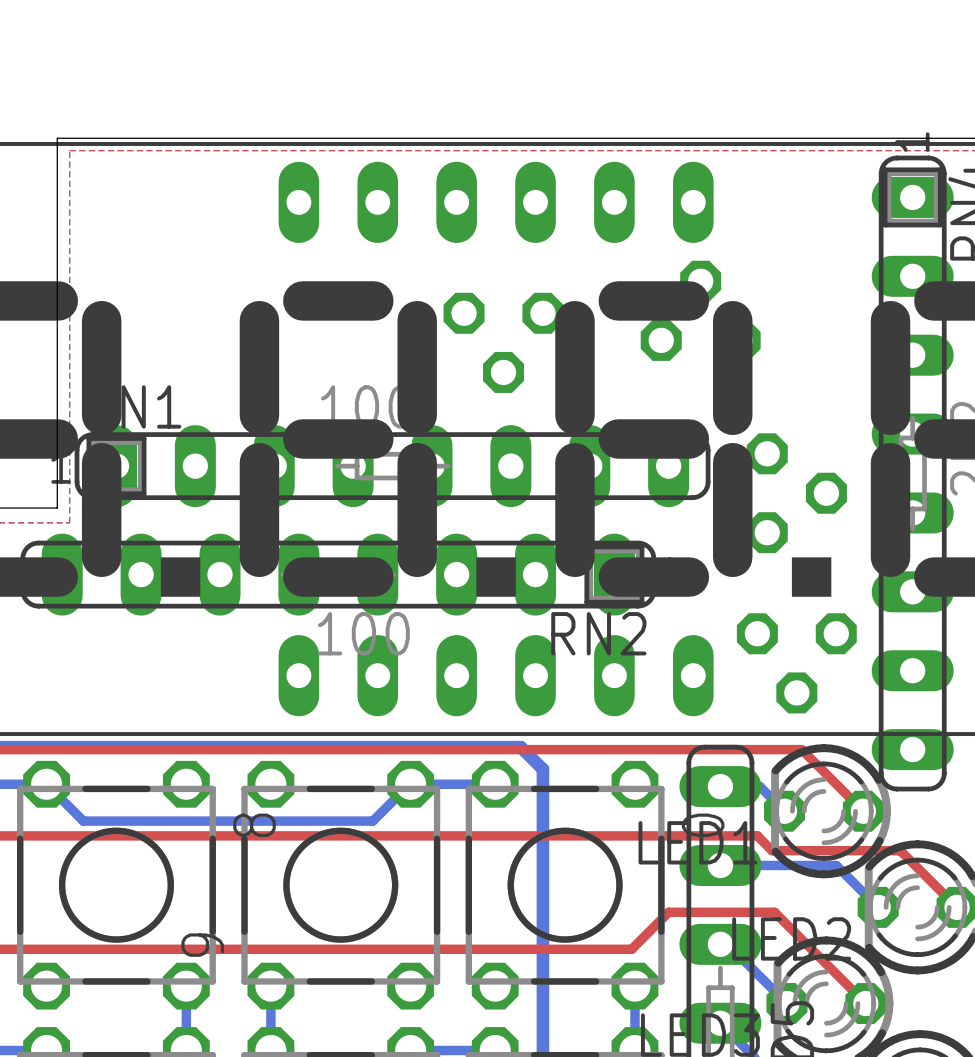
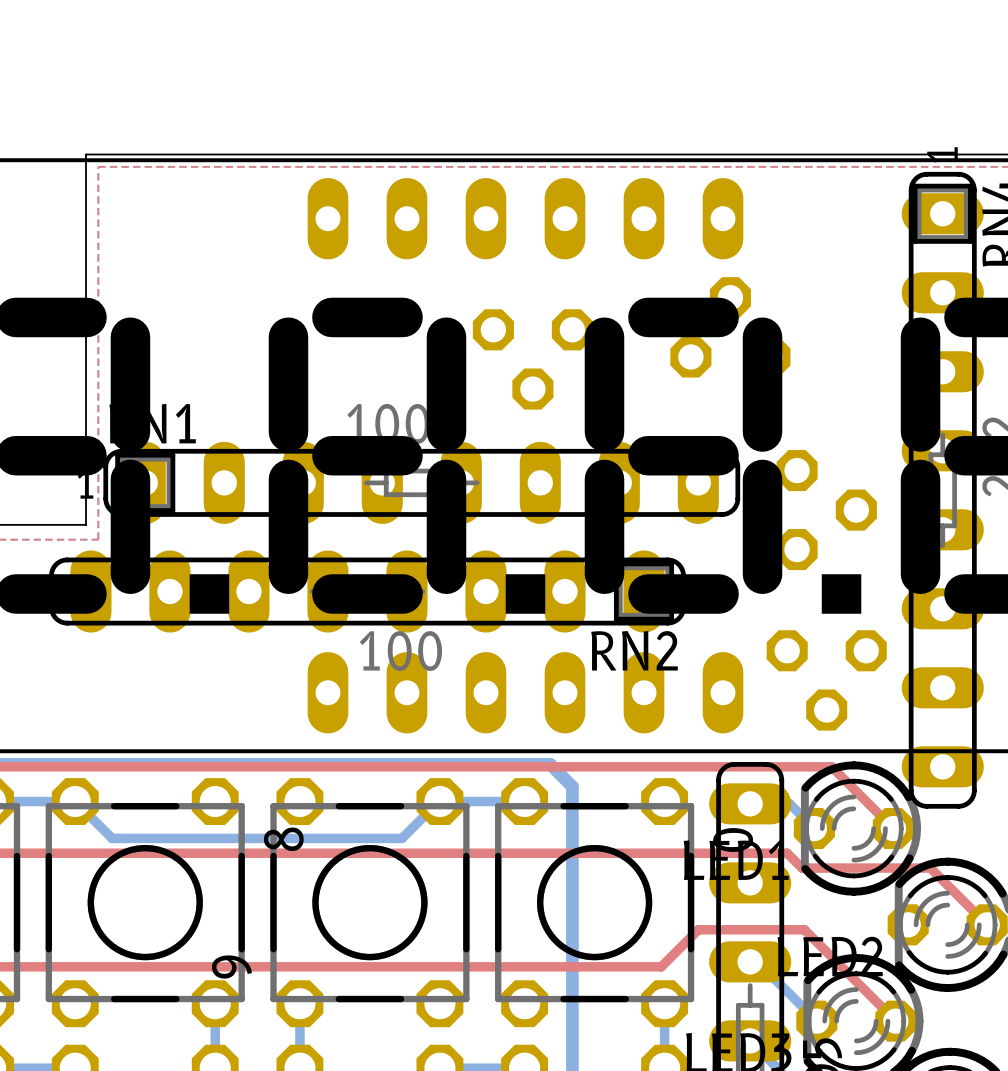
bottom track: (720, 865) (836, 865) (878, 907) -> none

